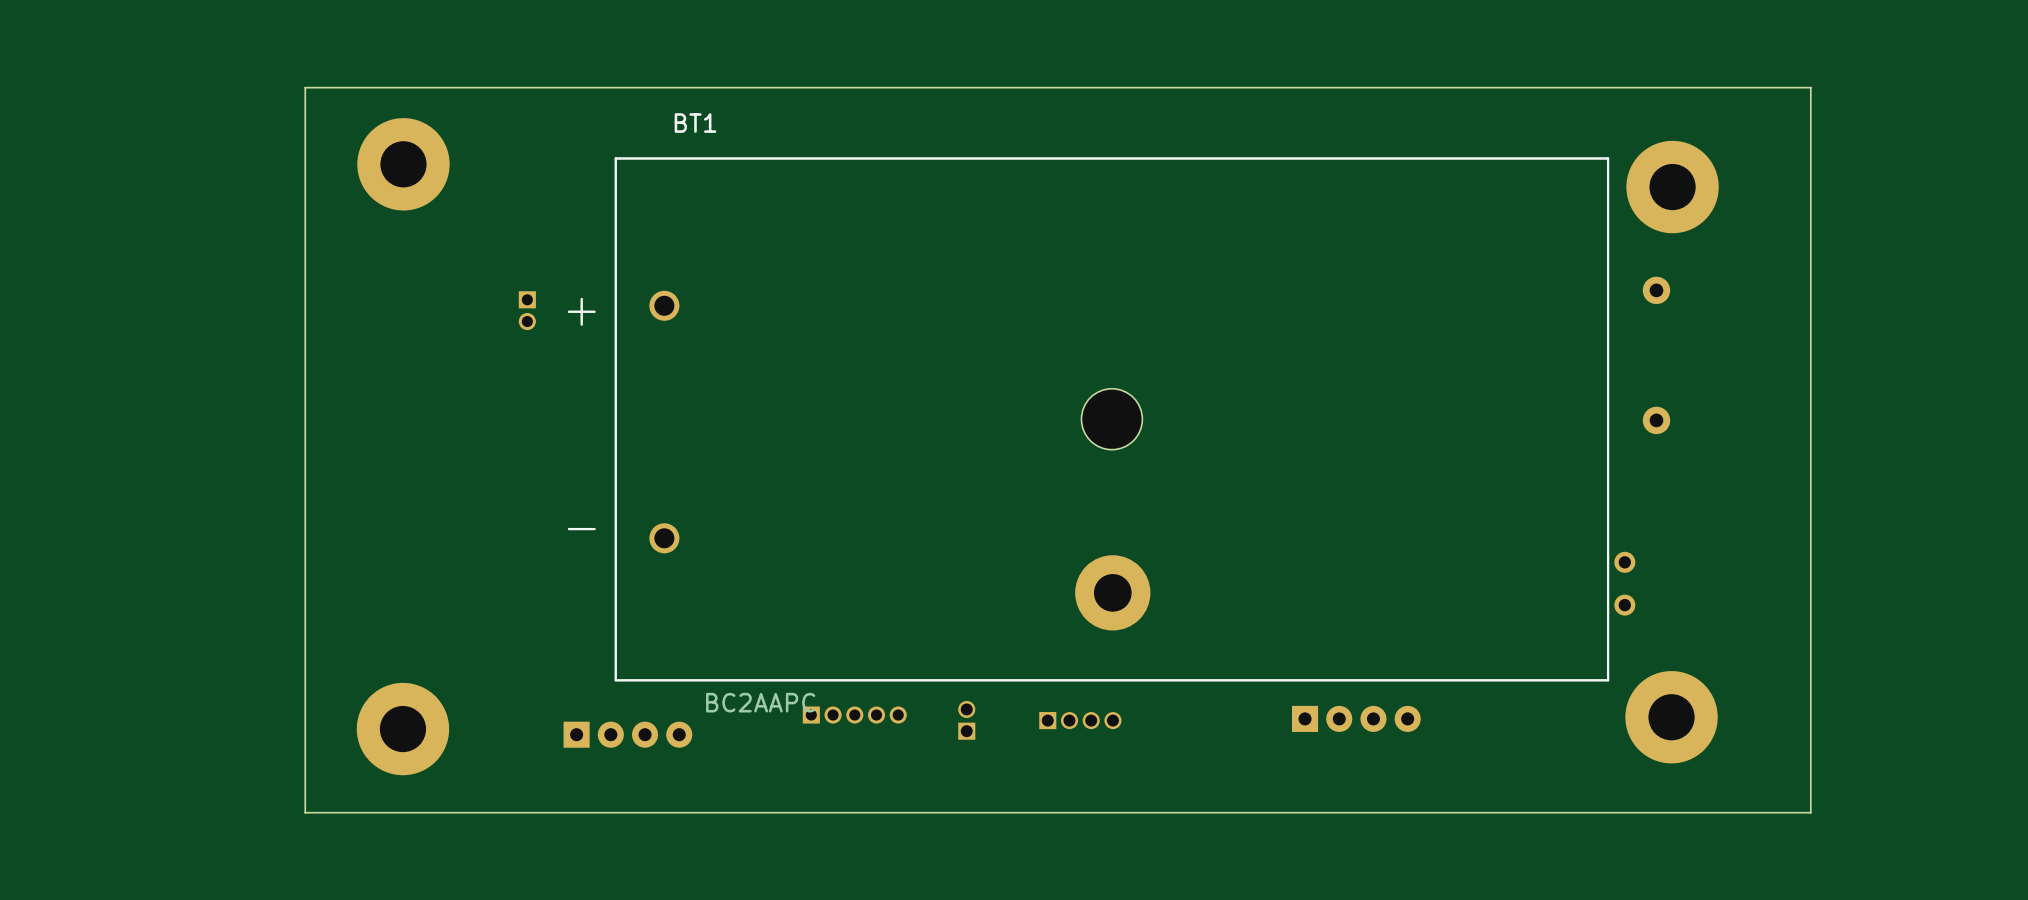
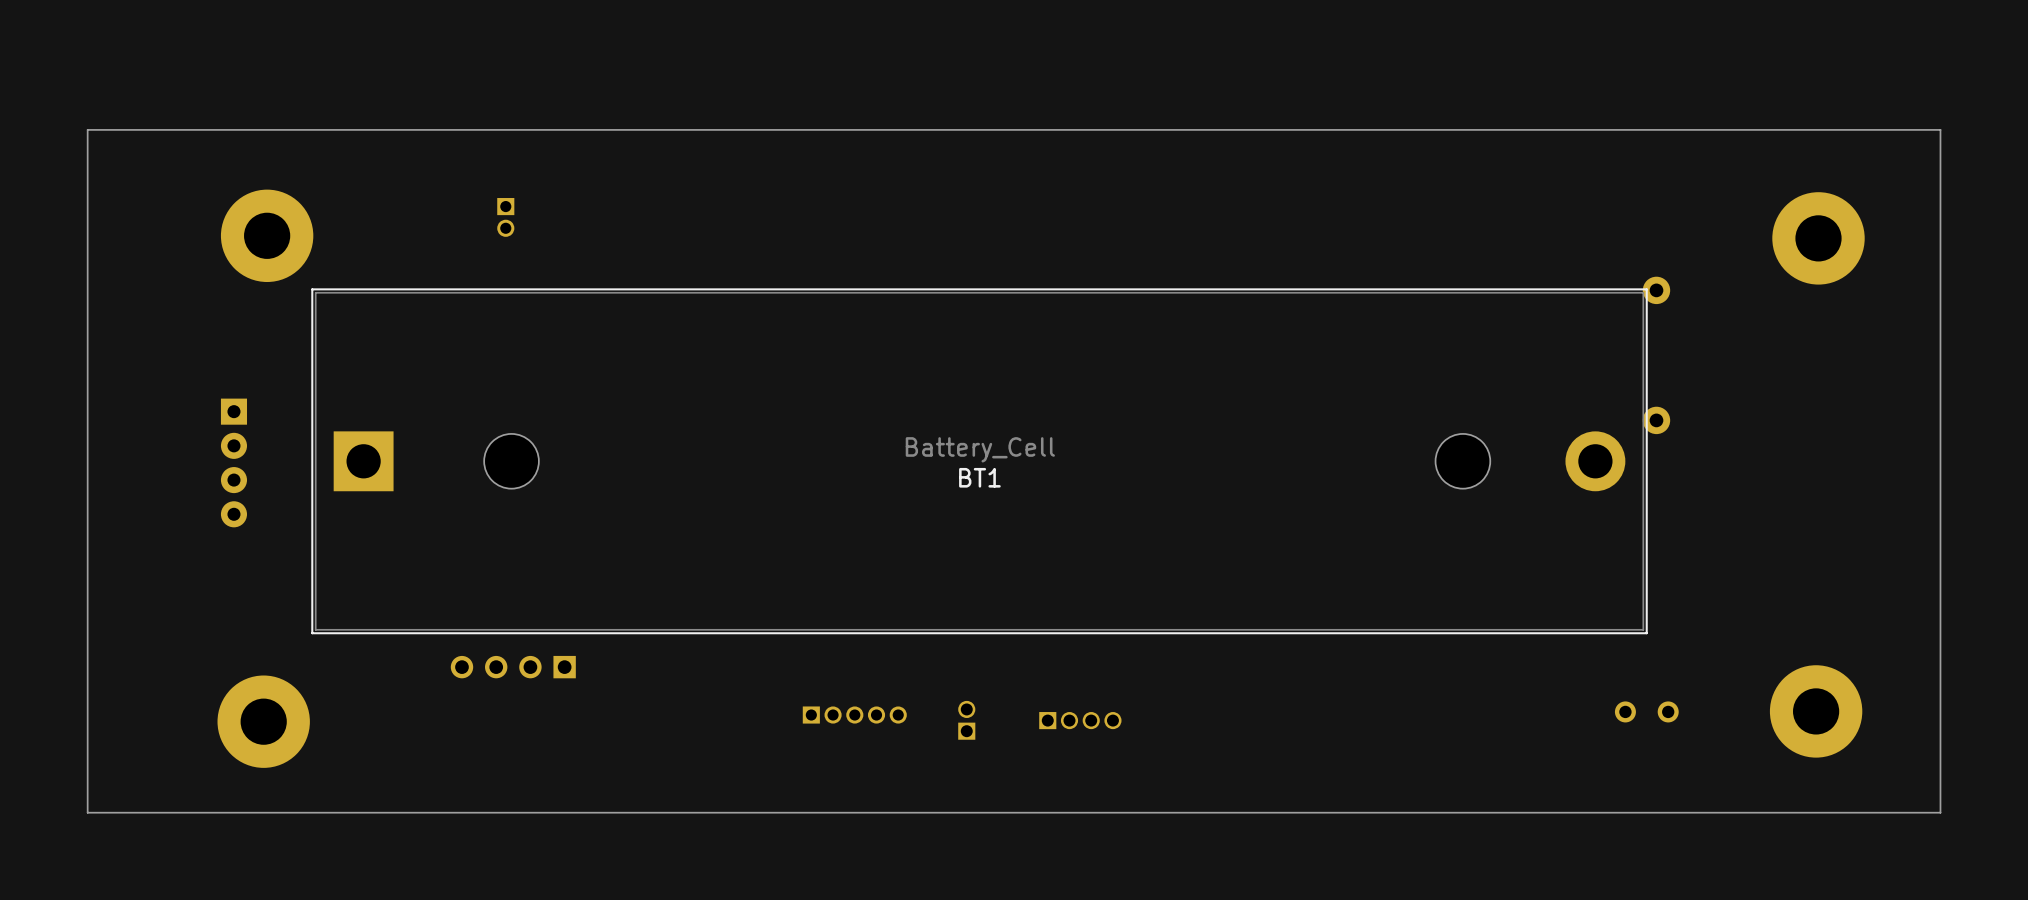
BT1 name position: BT1 (695, 123) -> BT1 (979, 477)
BT1 footprint: [567, 157, 1610, 682] -> [311, 288, 1648, 635]
part position: (403, 164) -> (267, 235)
part position: (1672, 187) -> (1818, 238)
part position: (527, 310) -> (505, 217)
part: none -> (233, 462)
part rotation: 0° (1624, 583) -> 90° clockwise (1646, 711)
part position: (1624, 583) -> (1646, 711)
part: (1112, 592) -> none
part: none -> (513, 667)
BT1 value: BC2AAPC (760, 702) -> Battery_Cell (980, 449)
part position: (1671, 717) -> (1816, 711)
part: (1356, 718) -> none
part position: (402, 729) -> (263, 721)
part: (627, 734) -> none
board edge: (1810, 812) (1810, 87) (305, 87) (305, 812) -> (1810, 812) (1940, 812) (1940, 129) (87, 129) (87, 812) (305, 812)

